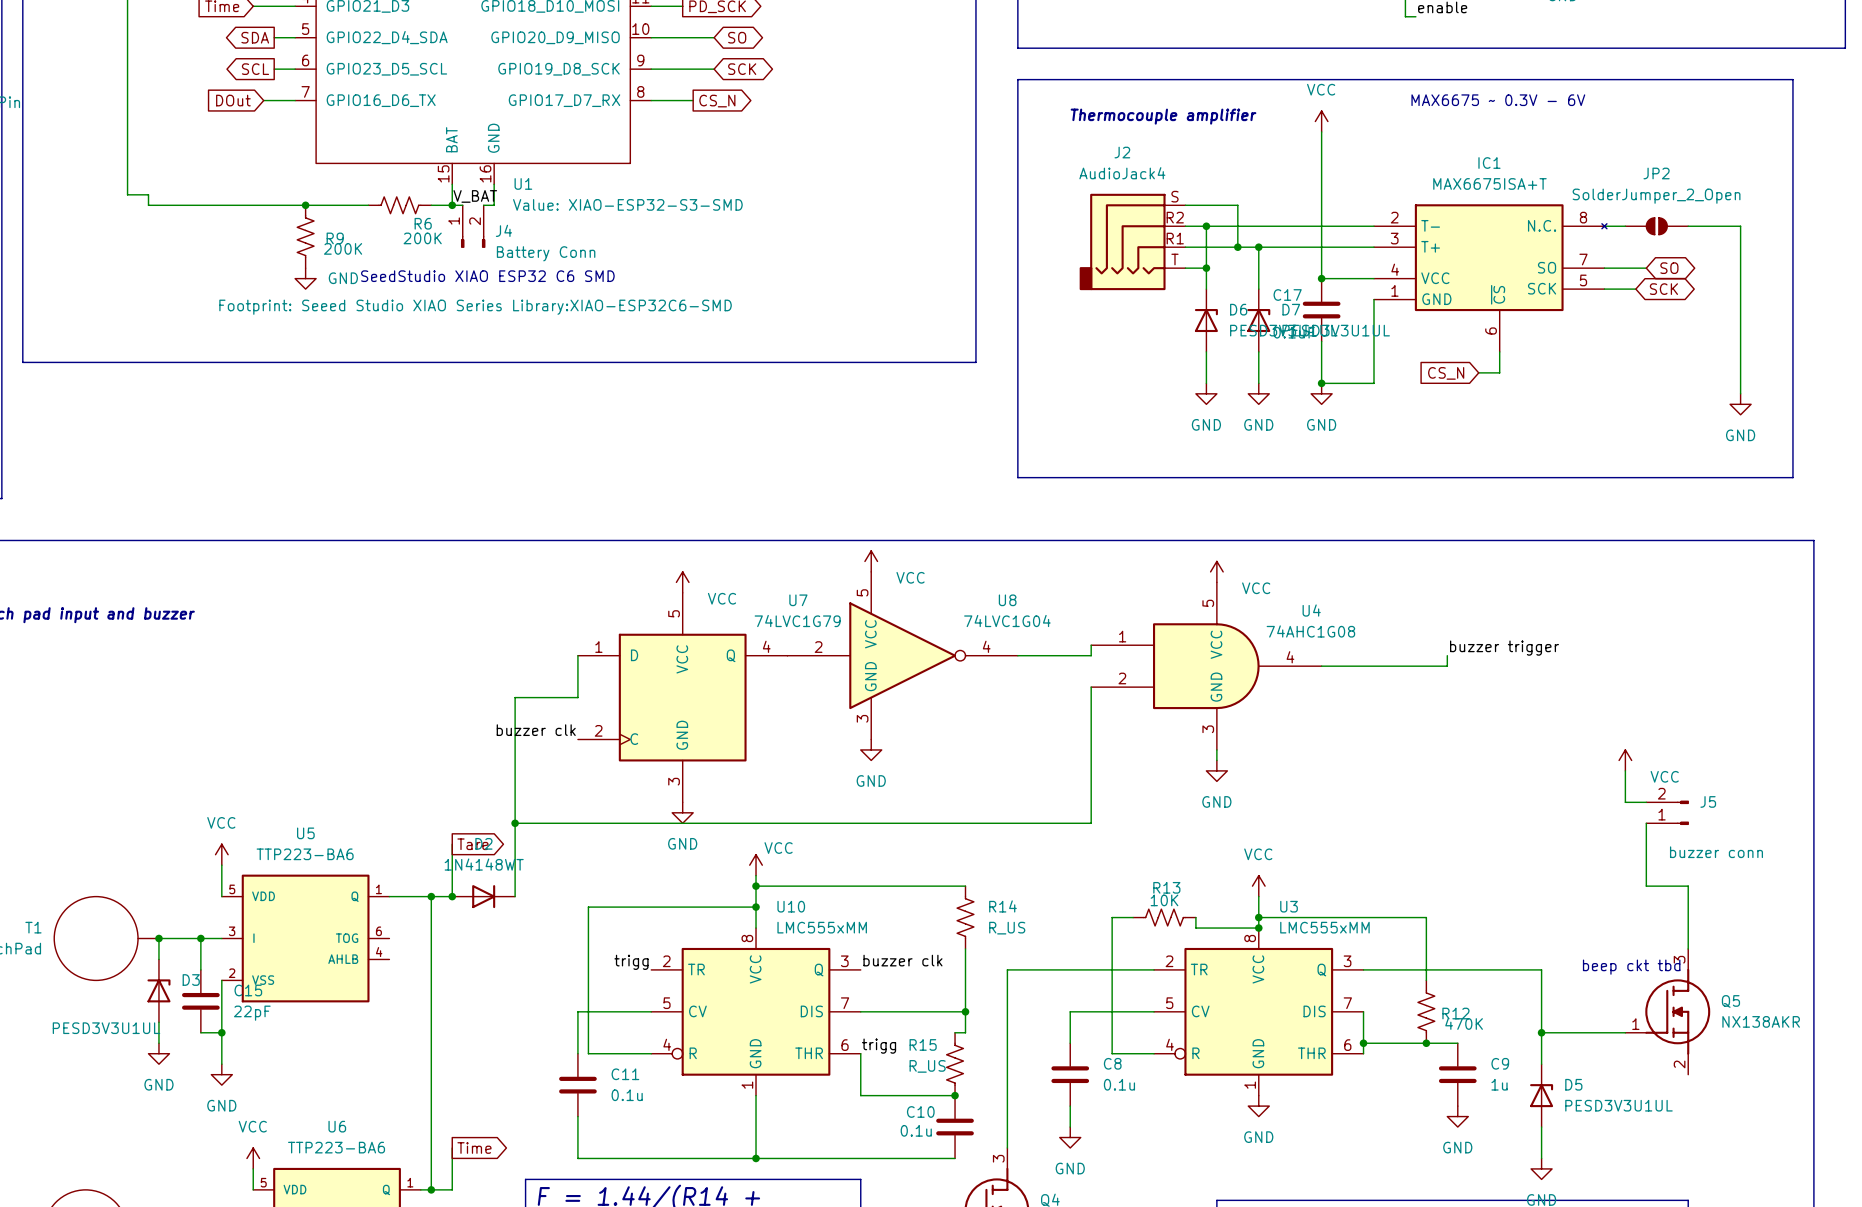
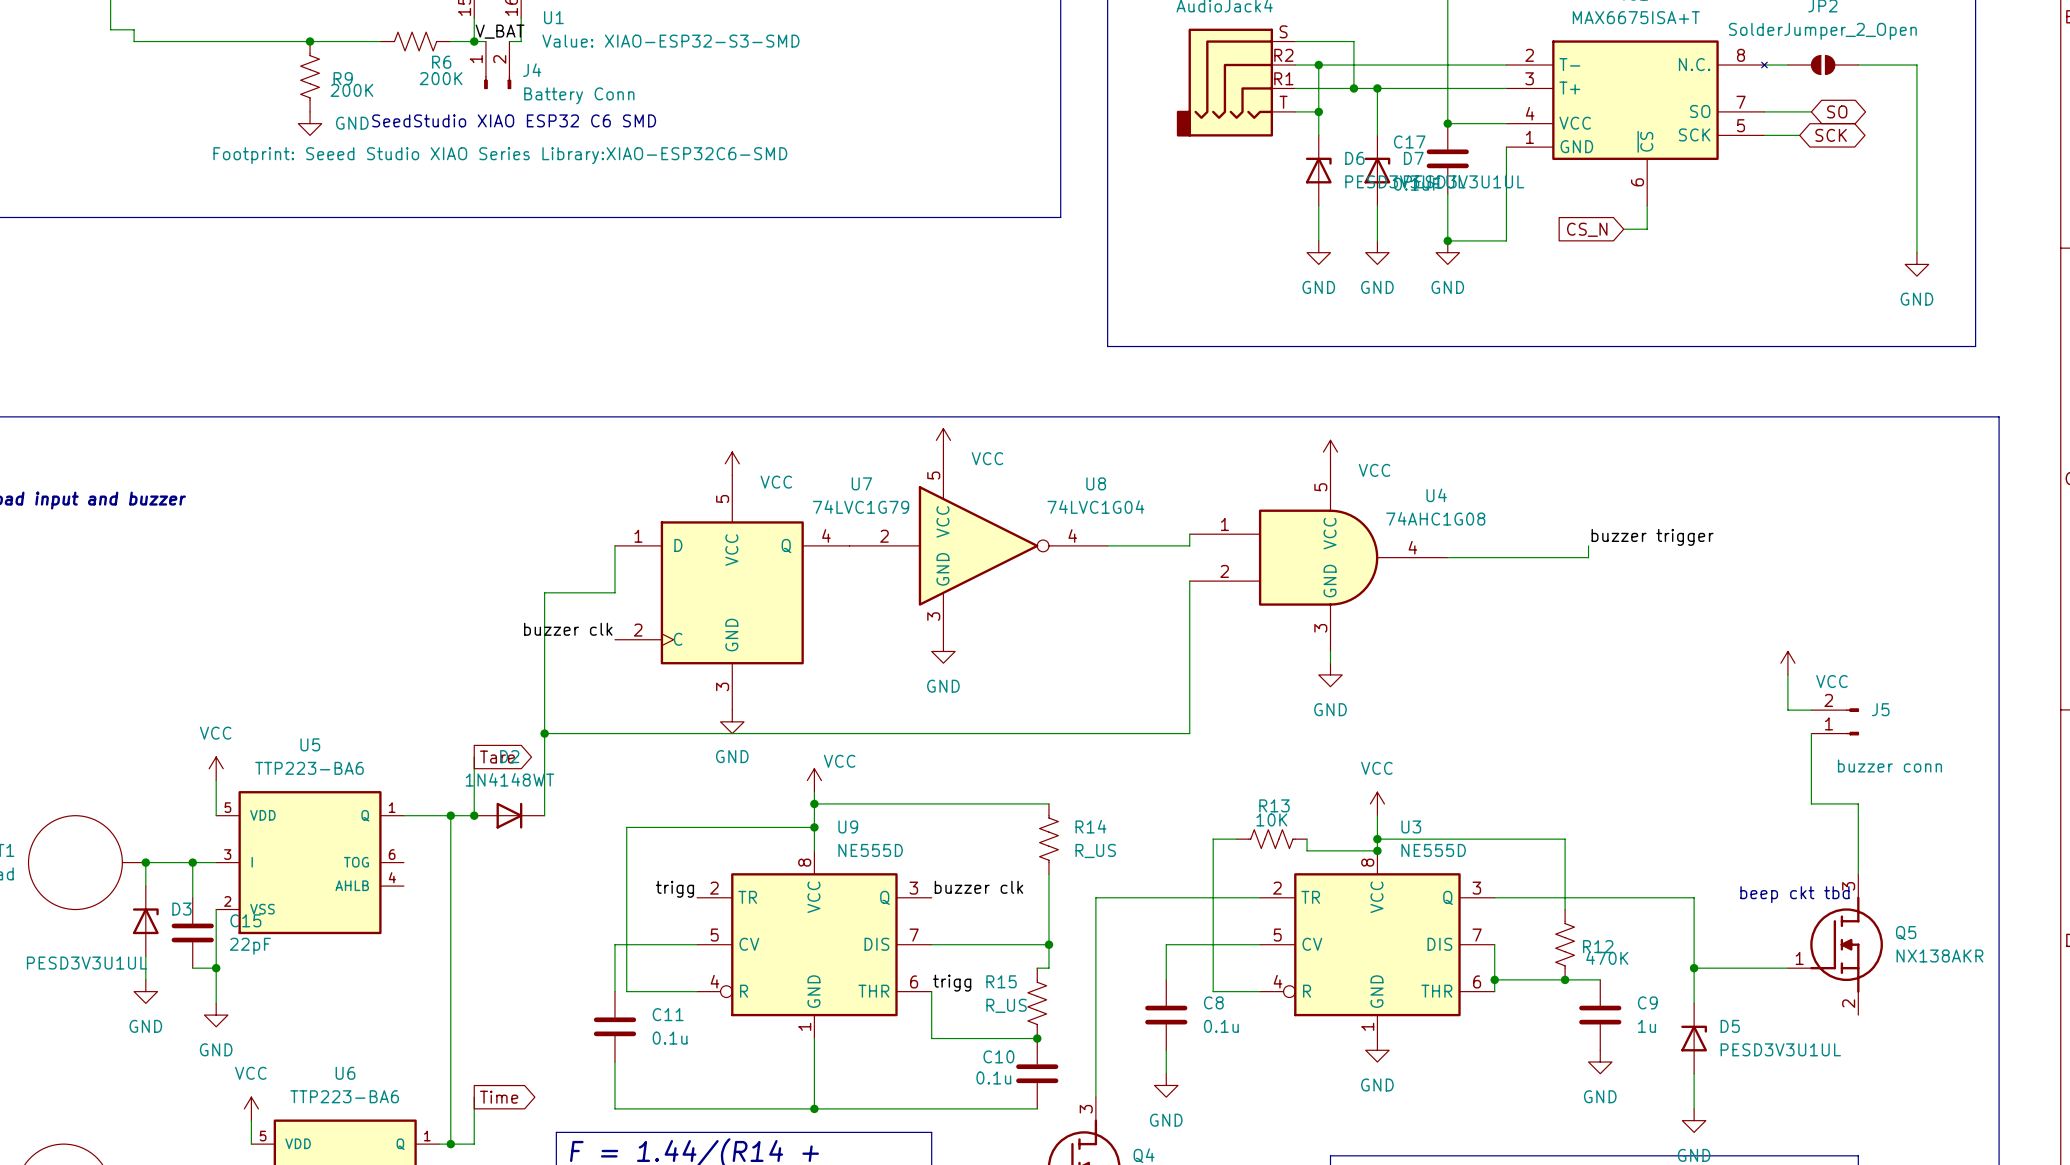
U10 name: U10 (791, 906) -> U9 (848, 826)
U10 value: LMC555xMM (822, 927) -> NE555D (870, 850)
U3 value: LMC555xMM (1324, 927) -> NE555D (1433, 850)

